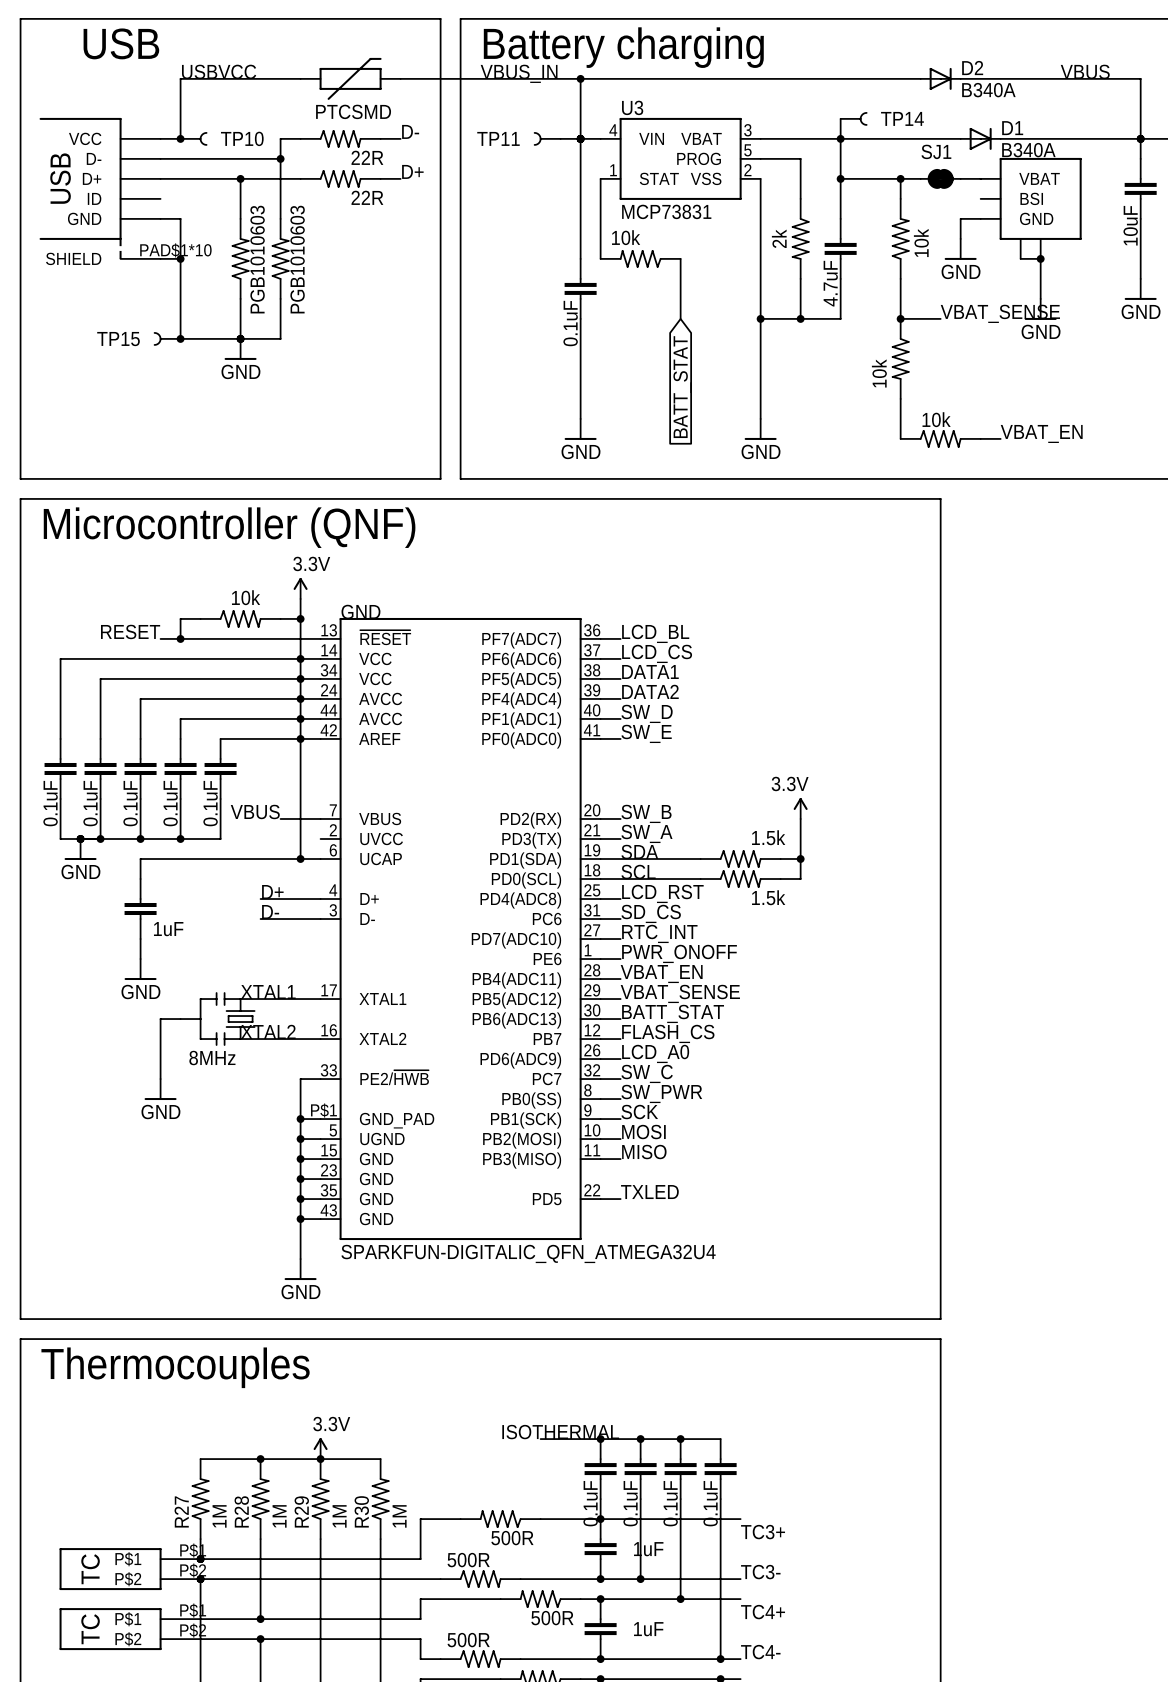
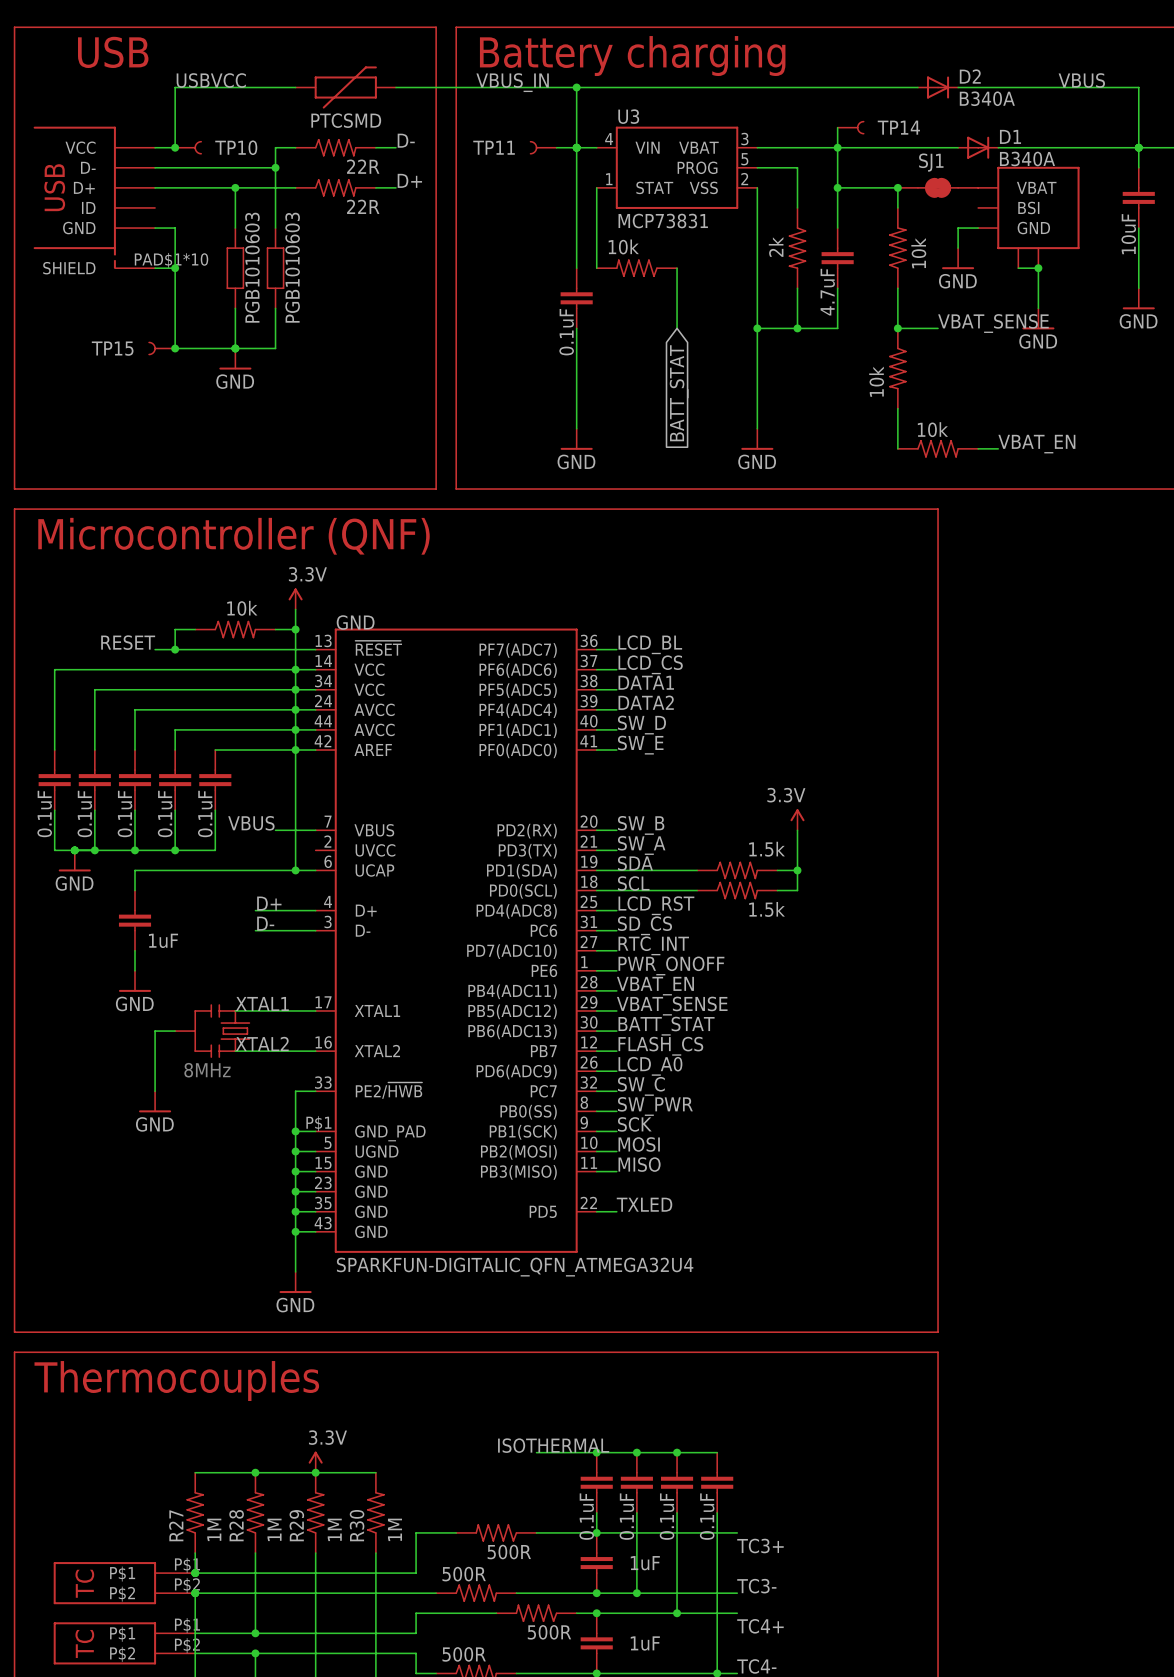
part symbol: [231, 218, 250, 299] -> [226, 228, 245, 309]
part symbol: [271, 218, 290, 299] -> [266, 228, 285, 309]

